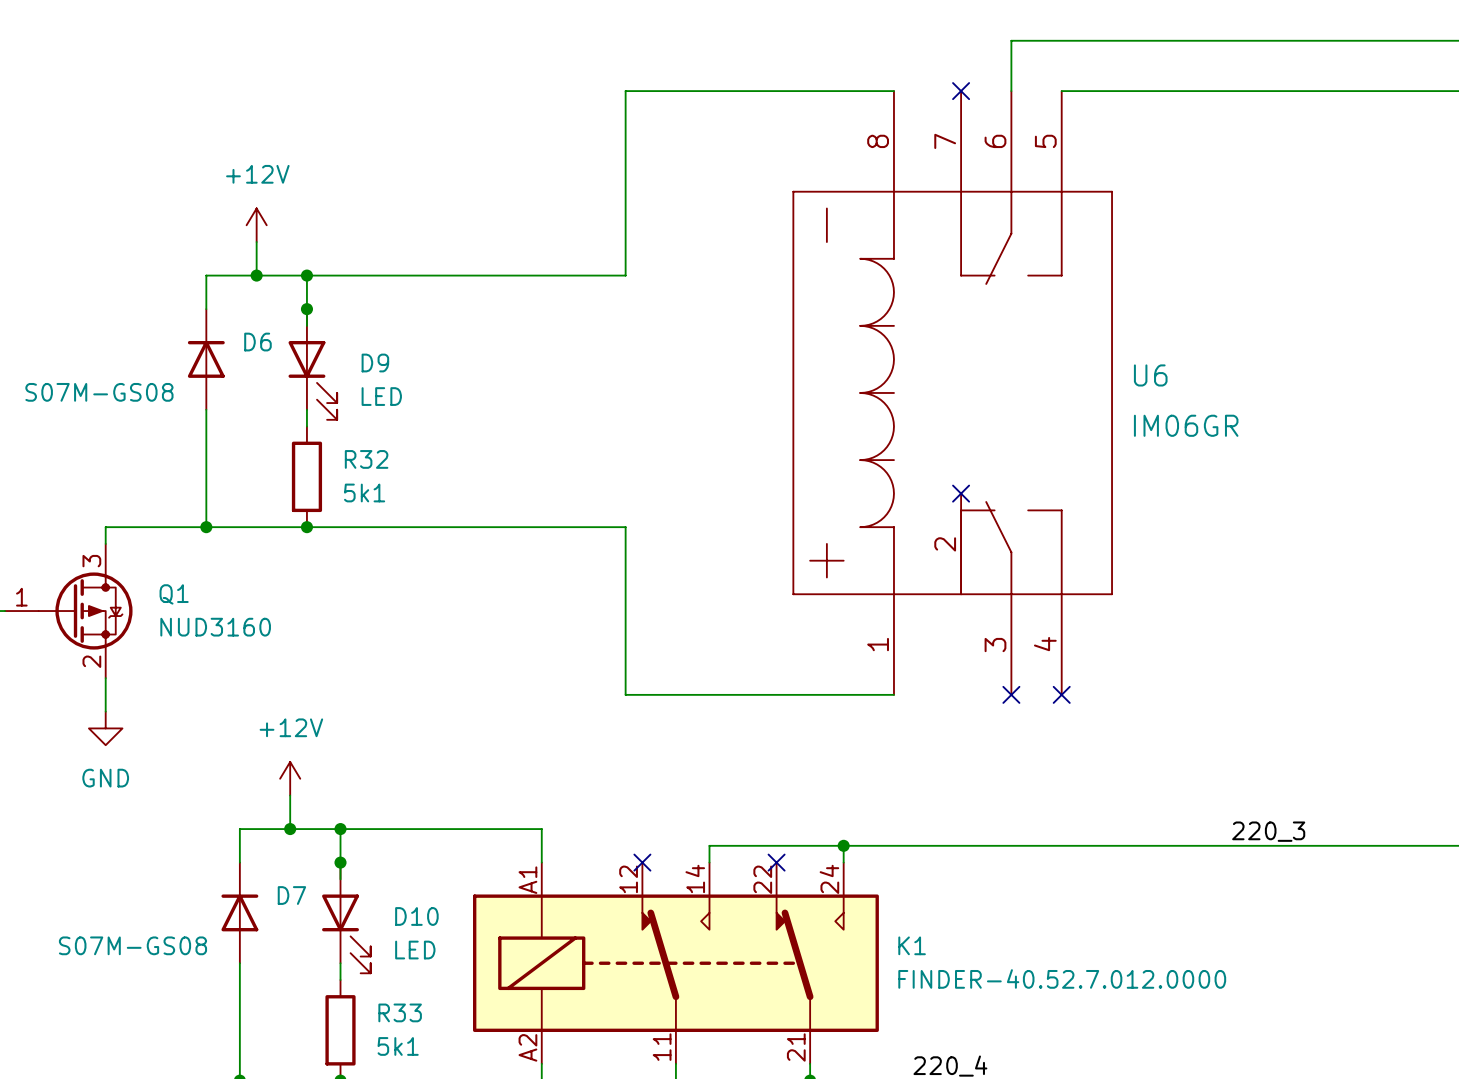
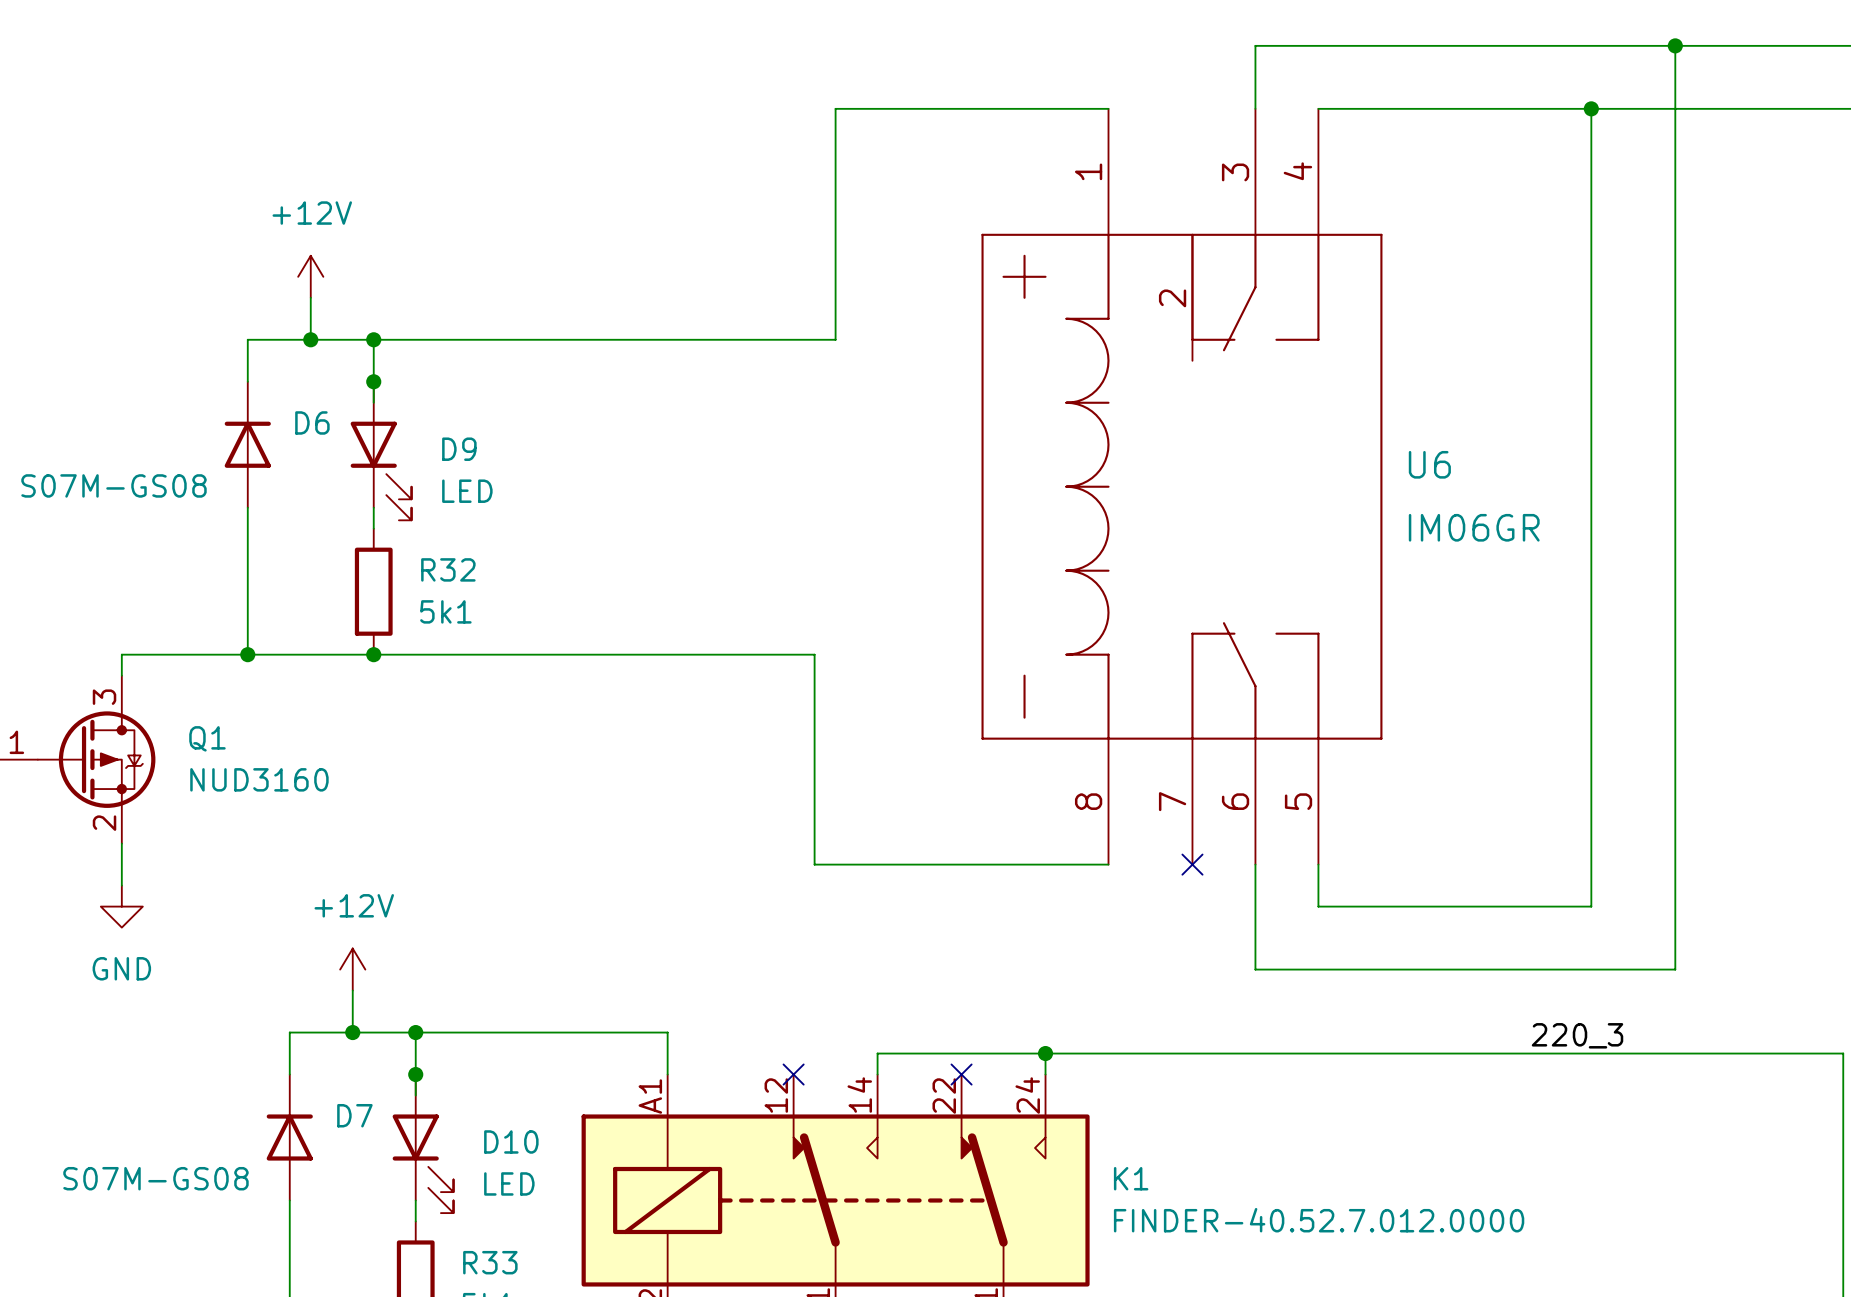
wire: none -> (1675, 45) (1675, 969) (1255, 969) (1255, 864)
junction: none -> (1675, 45)
wire: (675, 91) (625, 91) (625, 275) -> (835, 108) (835, 339) (772, 339)
no-connect mark: (961, 91) -> none
wire: none -> (1591, 108) (1591, 906) (1318, 906) (1318, 864)
junction: none -> (1591, 108)
U6 flip: as is (952, 392) -> up-down (1181, 486)
no-connect mark: (961, 493) -> none
wire: (625, 527) (625, 694) (659, 694) -> (772, 654) (814, 654) (814, 864)
no-connect mark: none -> (1192, 864)
no-connect mark: (1011, 694) -> none
no-connect mark: (1061, 694) -> none

